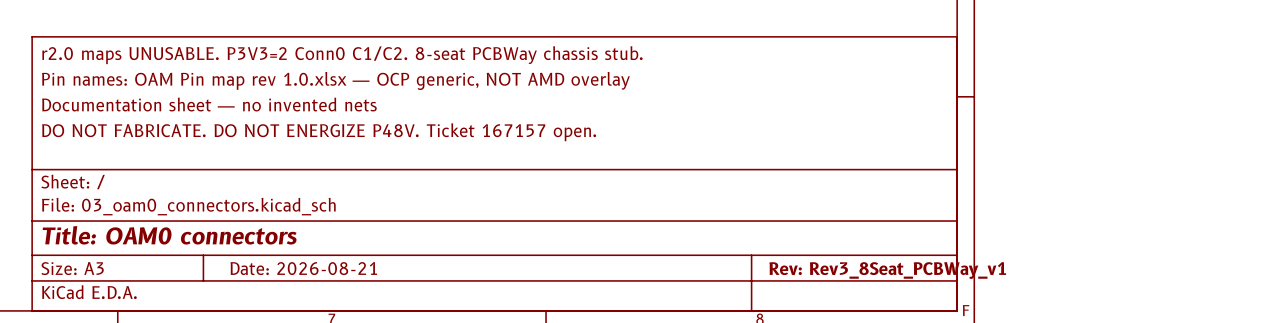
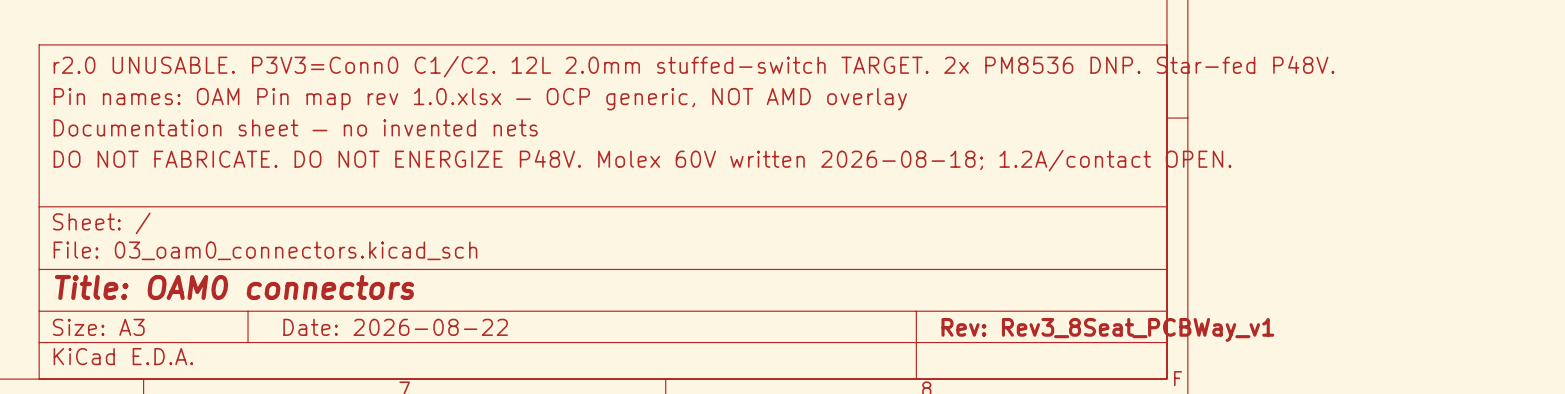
title block: r2.0 maps UNUSABLE. P3V3=2 Conn0 C1/C2. 8-seat PCBWay chassis stub. (342, 55) -> r2.0 UNUSABLE. P3V3=Conn0 C1/C2. 12L 2.0mm stuffed-switch TARGET. 2x PM8536 DNP. Star-fed P48V. (694, 66)
title block: DO NOT FABRICATE. DO NOT ENERGIZE P48V. Ticket 167157 open. (319, 132) -> DO NOT FABRICATE. DO NOT ENERGIZE P48V. Molex 60V written 2026-08-18; 1.2A/contact OPEN. (642, 160)
title block: Date: 2026-08-21 (303, 268) -> Date: 2026-08-22 (395, 327)

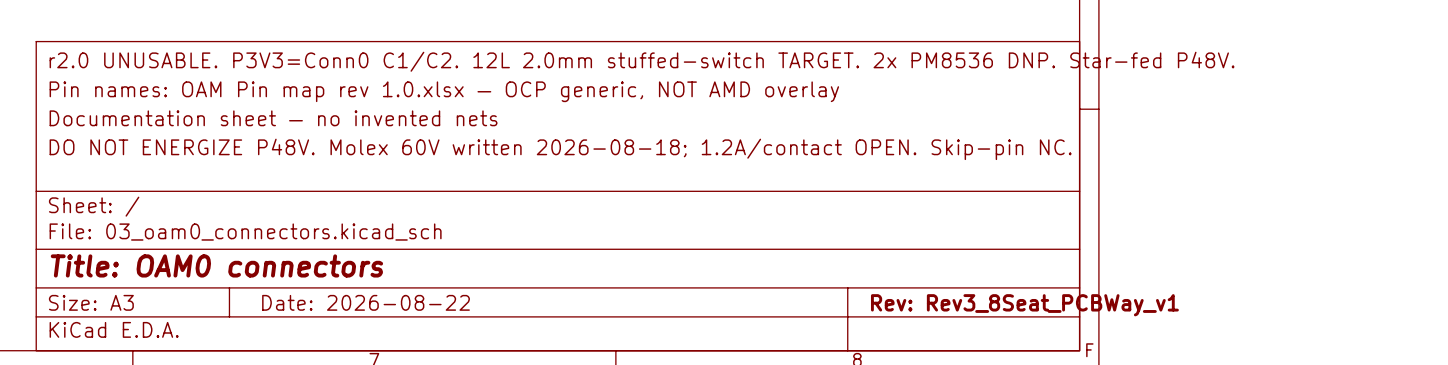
title block: DO NOT FABRICATE. DO NOT ENERGIZE P48V. Molex 60V written 2026-08-18; 1.2A/contact OPEN. (642, 160) -> DO NOT ENERGIZE P48V. Molex 60V written 2026-08-18; 1.2A/contact OPEN. Skip-pin NC. (560, 149)

